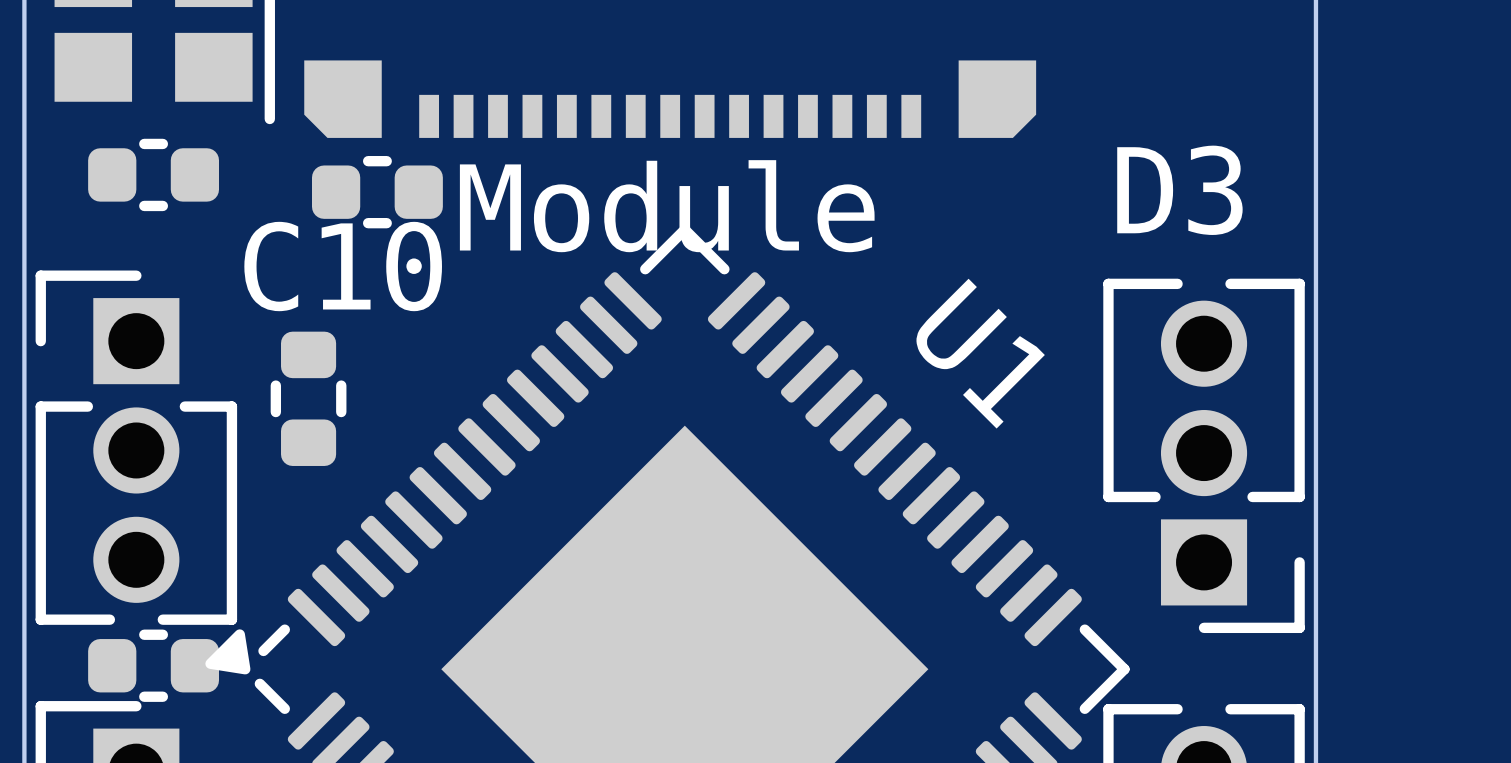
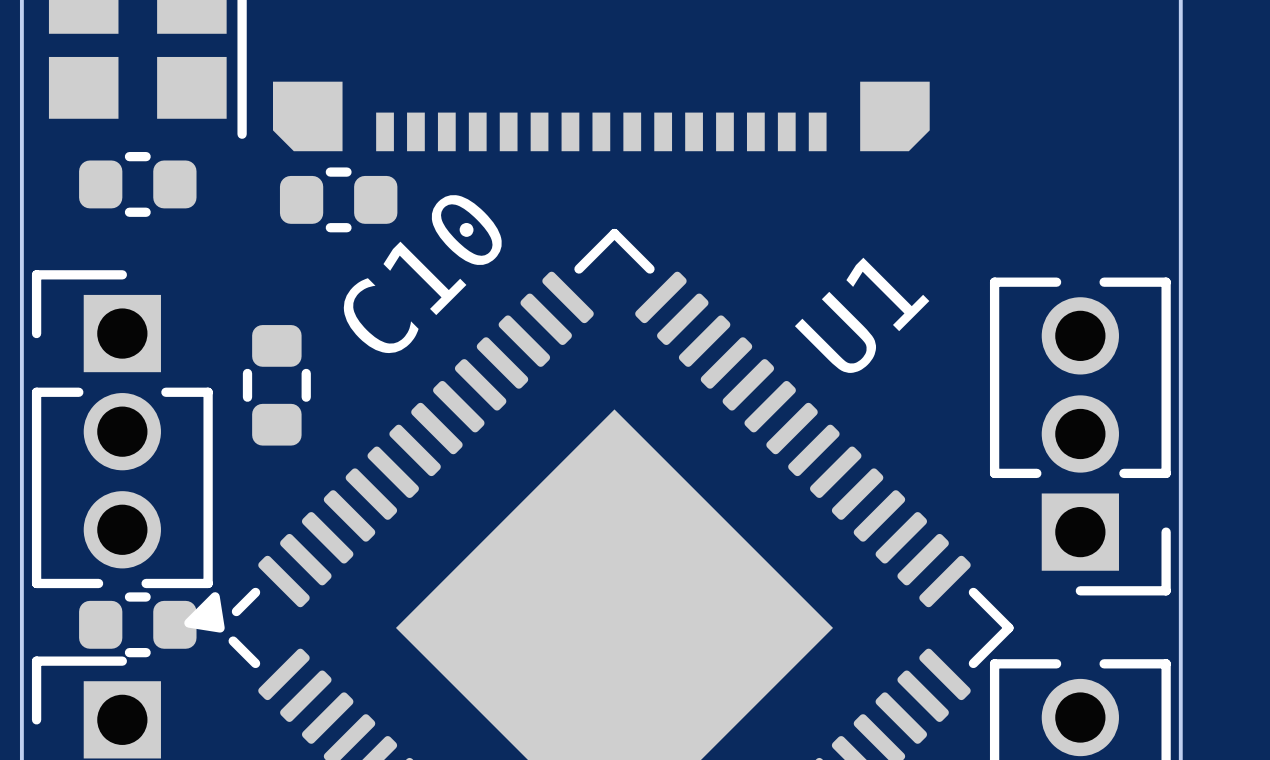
text: D3 (1179, 190) -> none
text: Module (667, 206) -> none
C10 name rotation: 0° (343, 266) -> 45° counterclockwise (423, 273)
U1 name rotation: 0° (980, 353) -> 90° counterclockwise (862, 315)

